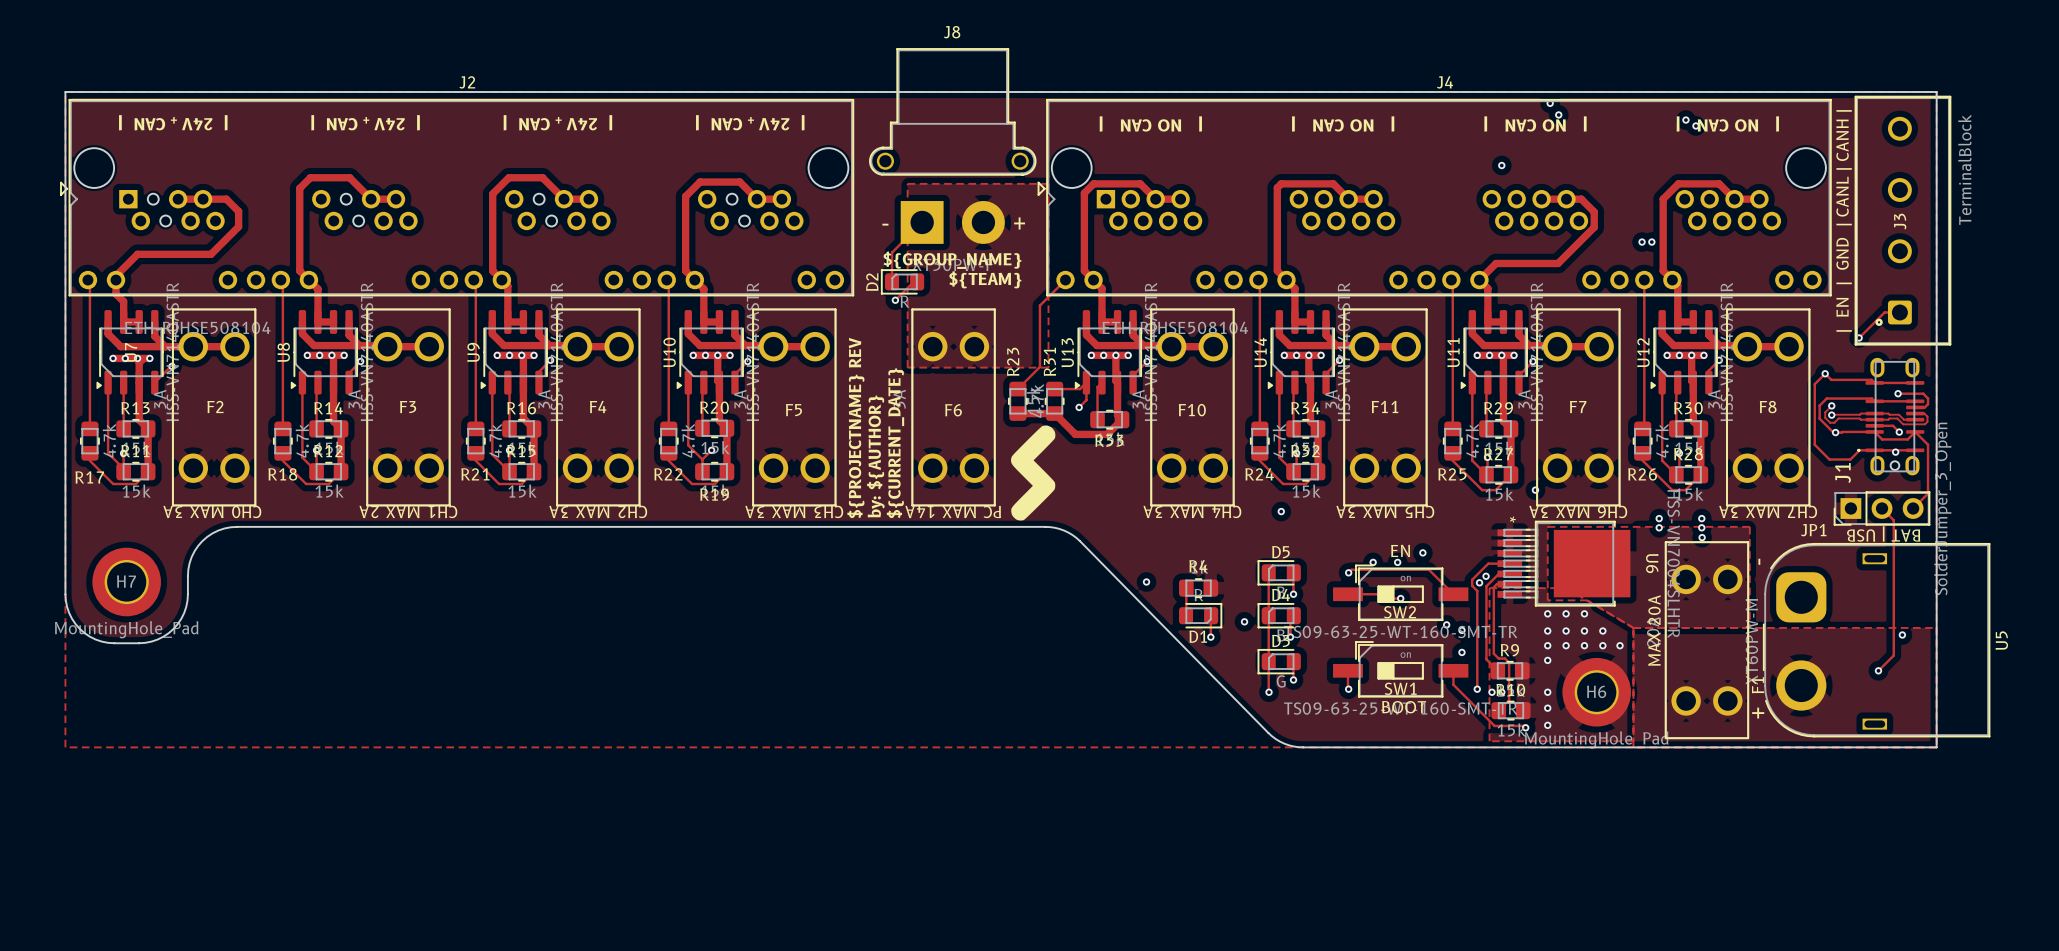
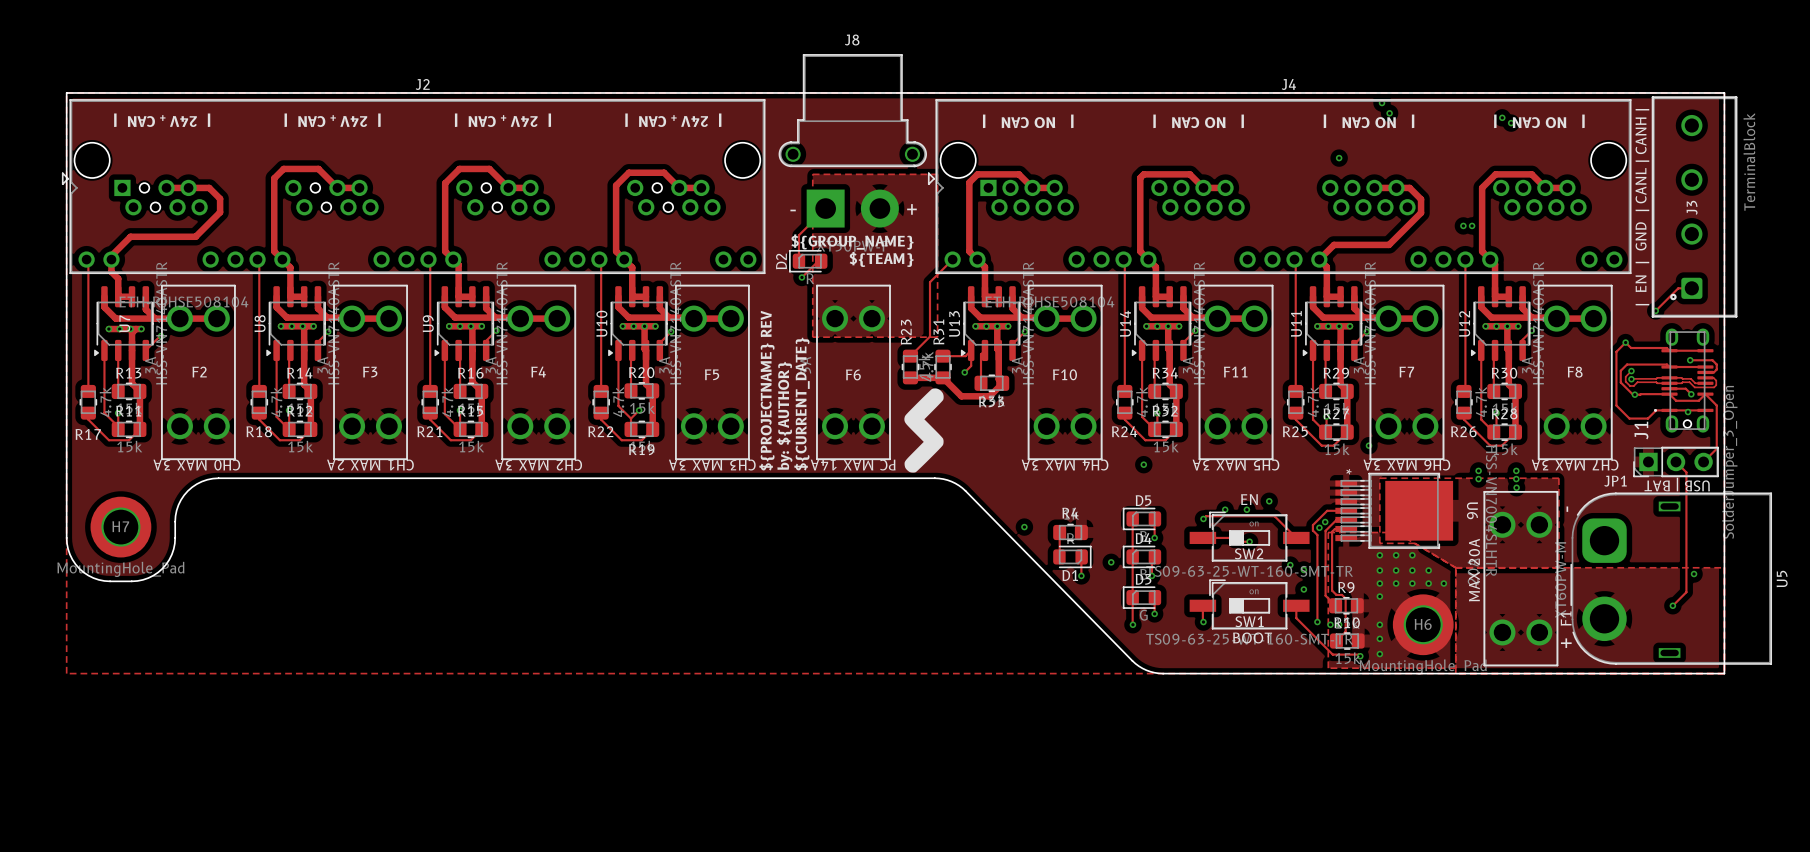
text: BAT | USB (1883, 533) -> USB | BAT (1677, 484)

